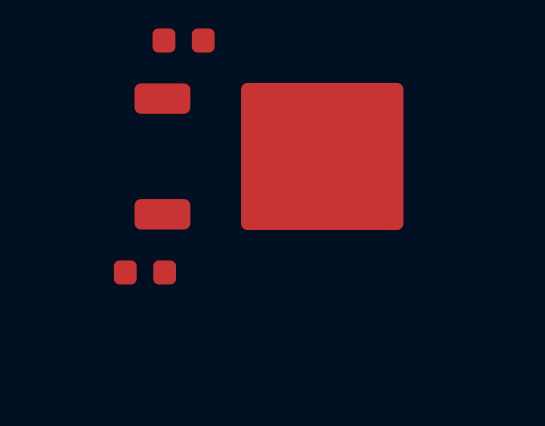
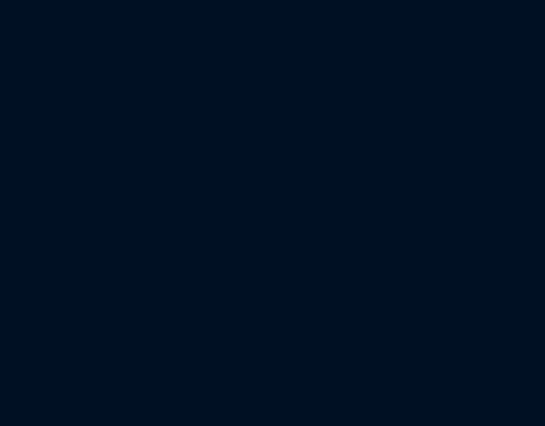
part: (183, 40) -> none
part: (268, 156) -> none
part: (144, 272) -> none

